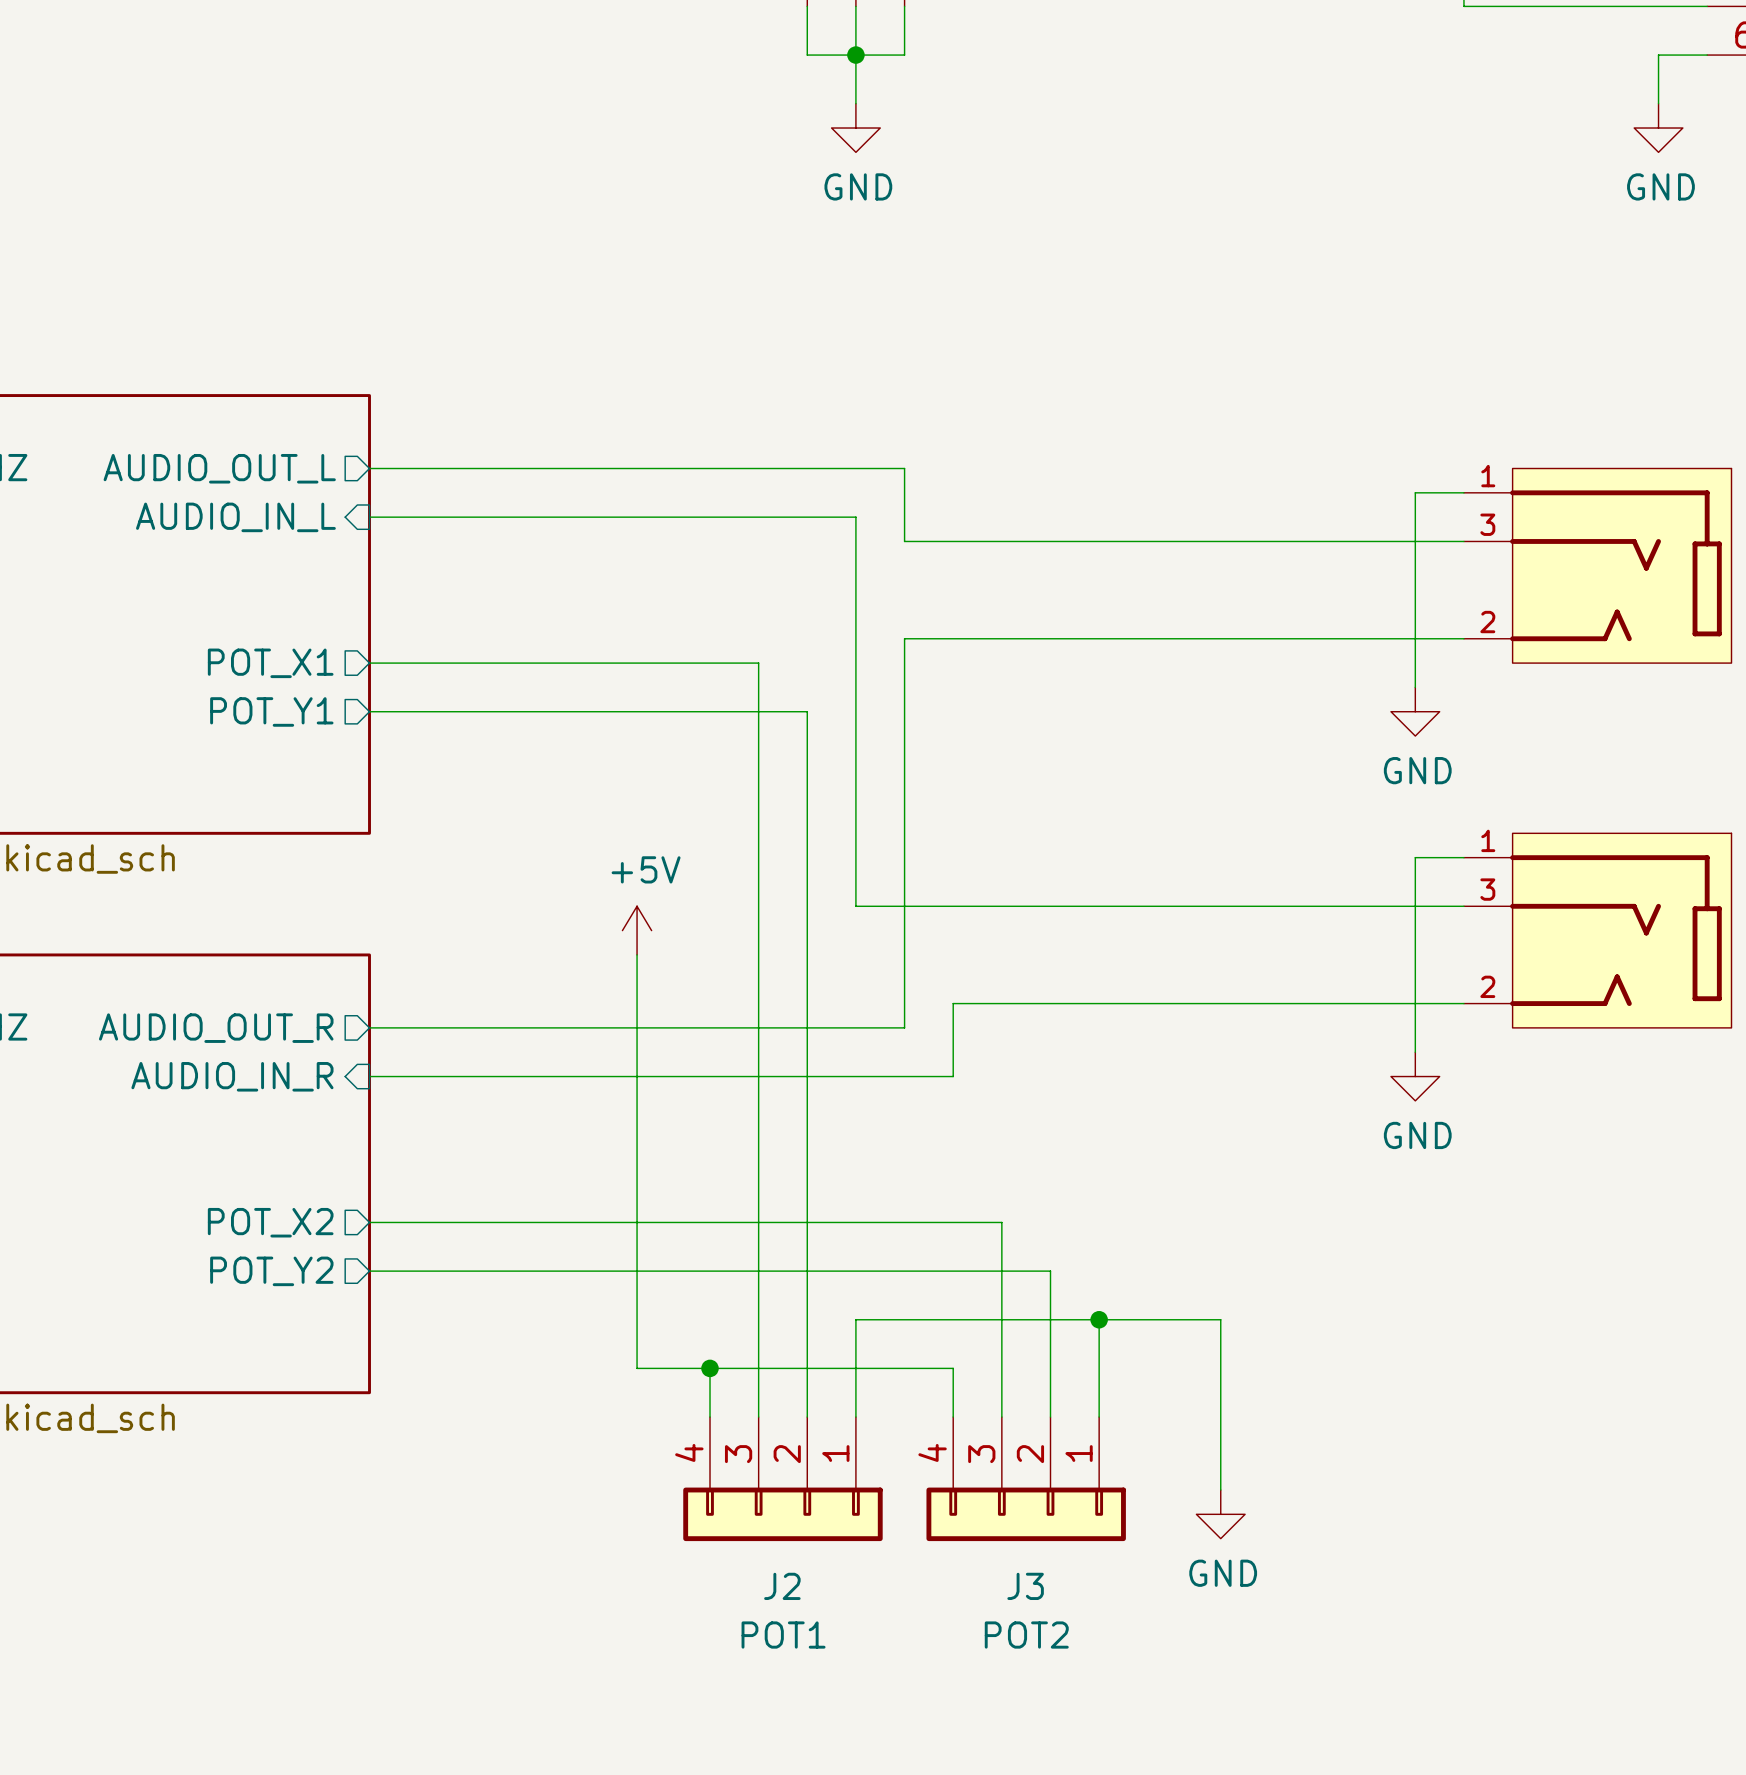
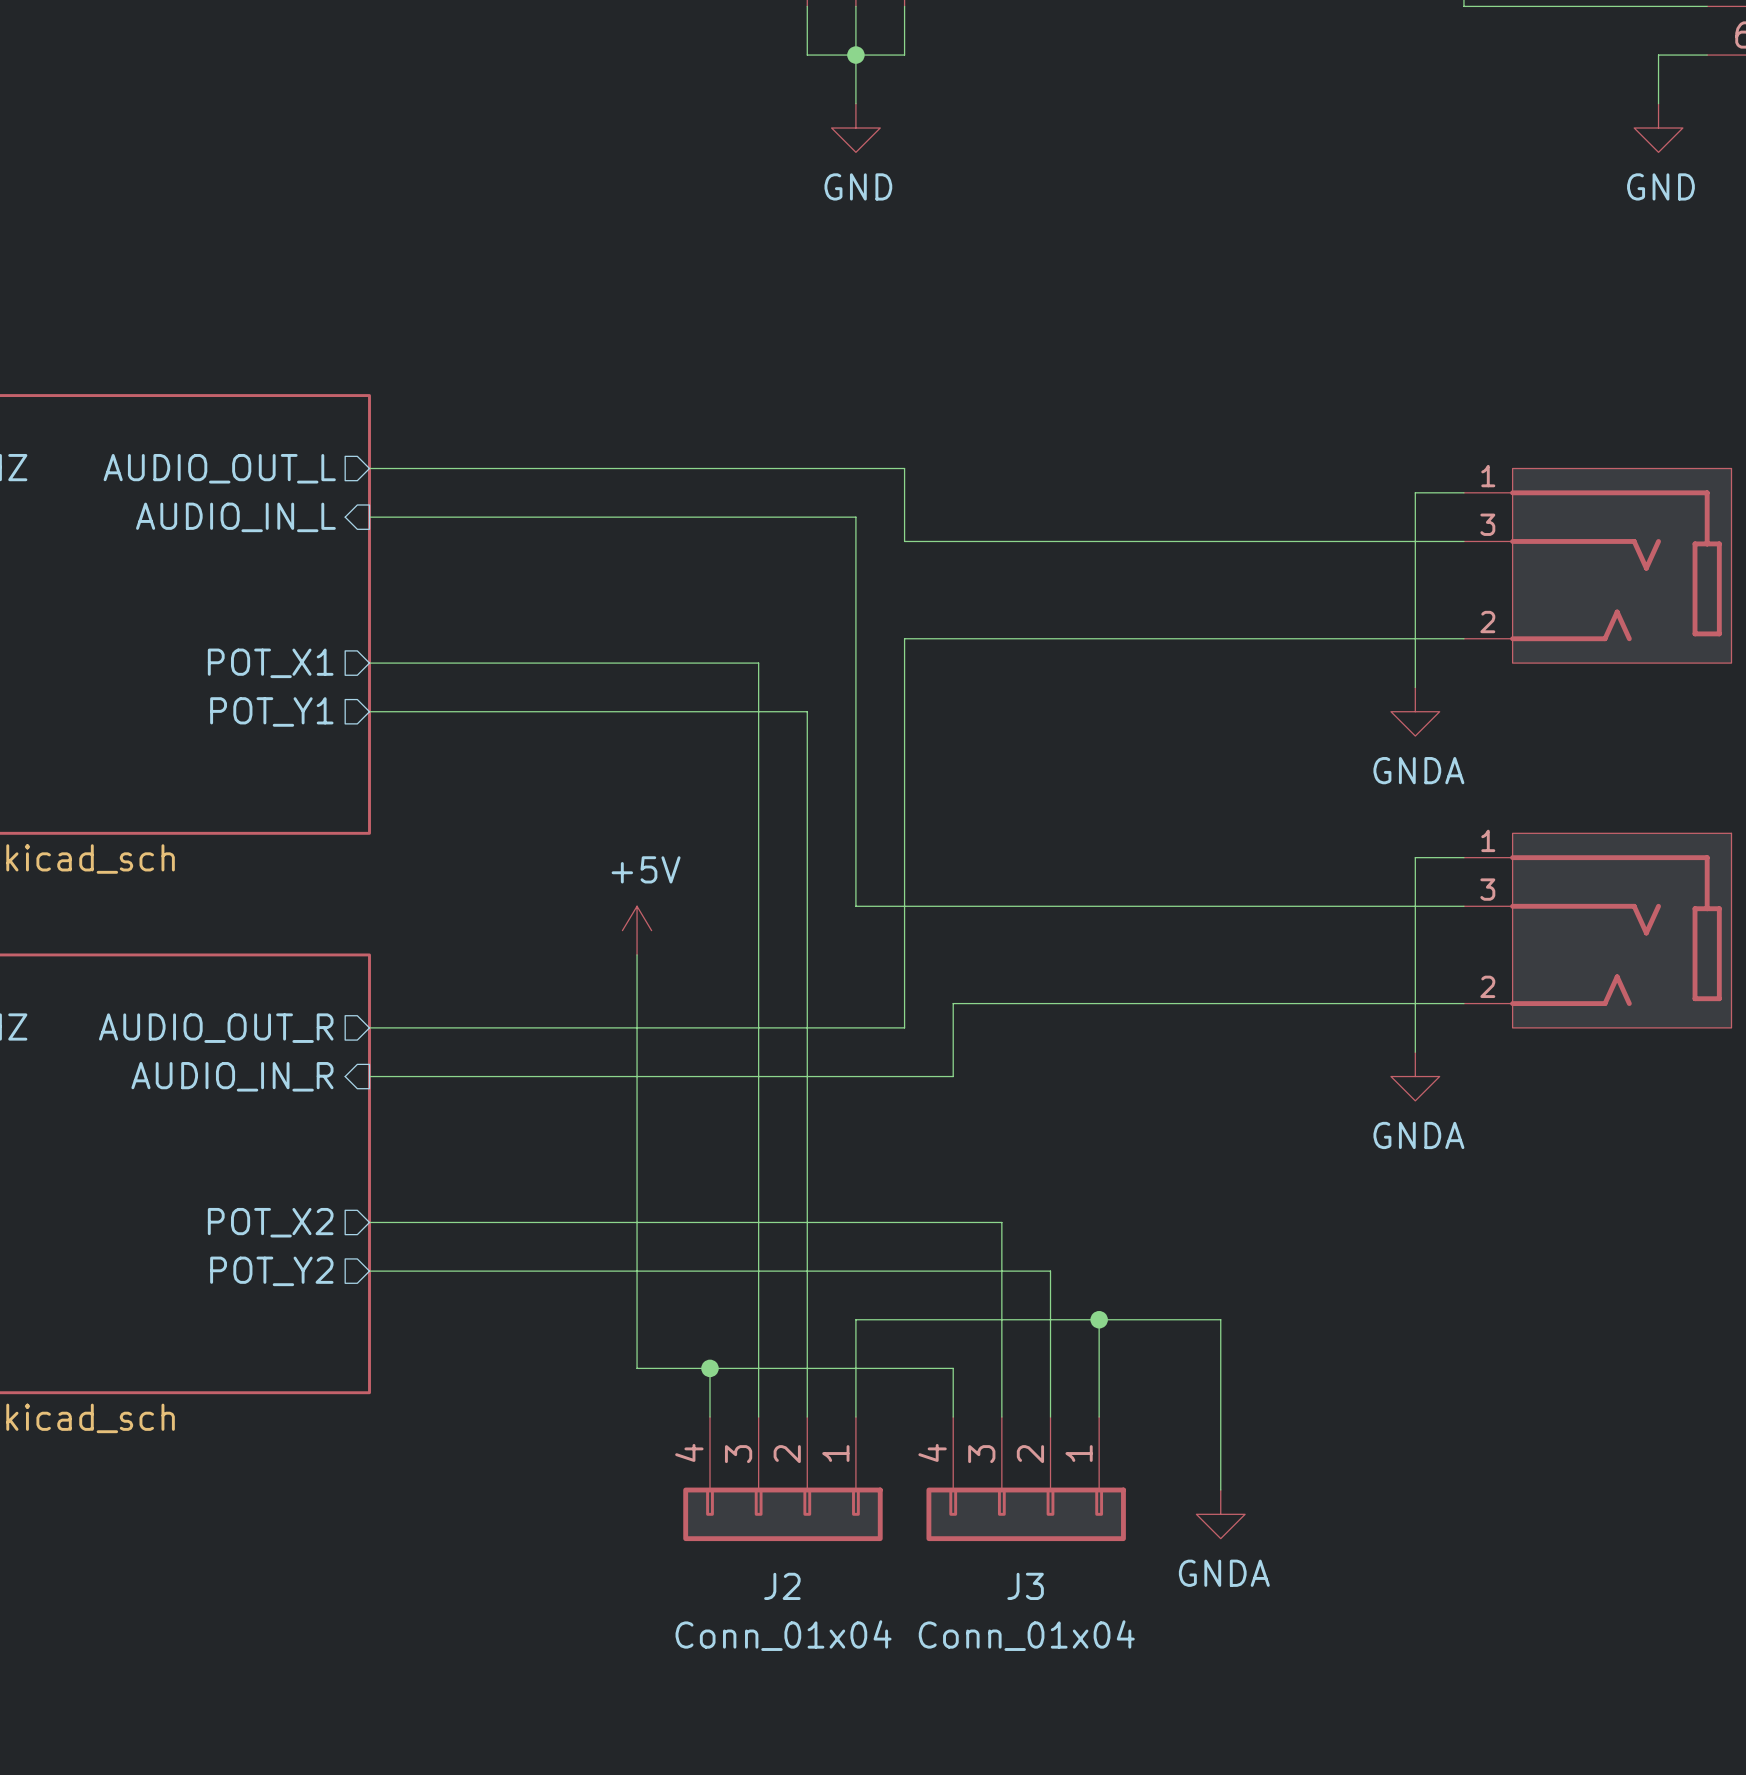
power symbol: GND (1415, 711) -> GNDA (1415, 711)
power symbol: GND (1415, 1076) -> GNDA (1415, 1076)
power symbol: GND (1220, 1514) -> GNDA (1220, 1514)
J2 value: POT1 (783, 1635) -> Conn_01x04 (783, 1635)
J3 value: POT2 (1026, 1635) -> Conn_01x04 (1026, 1635)

